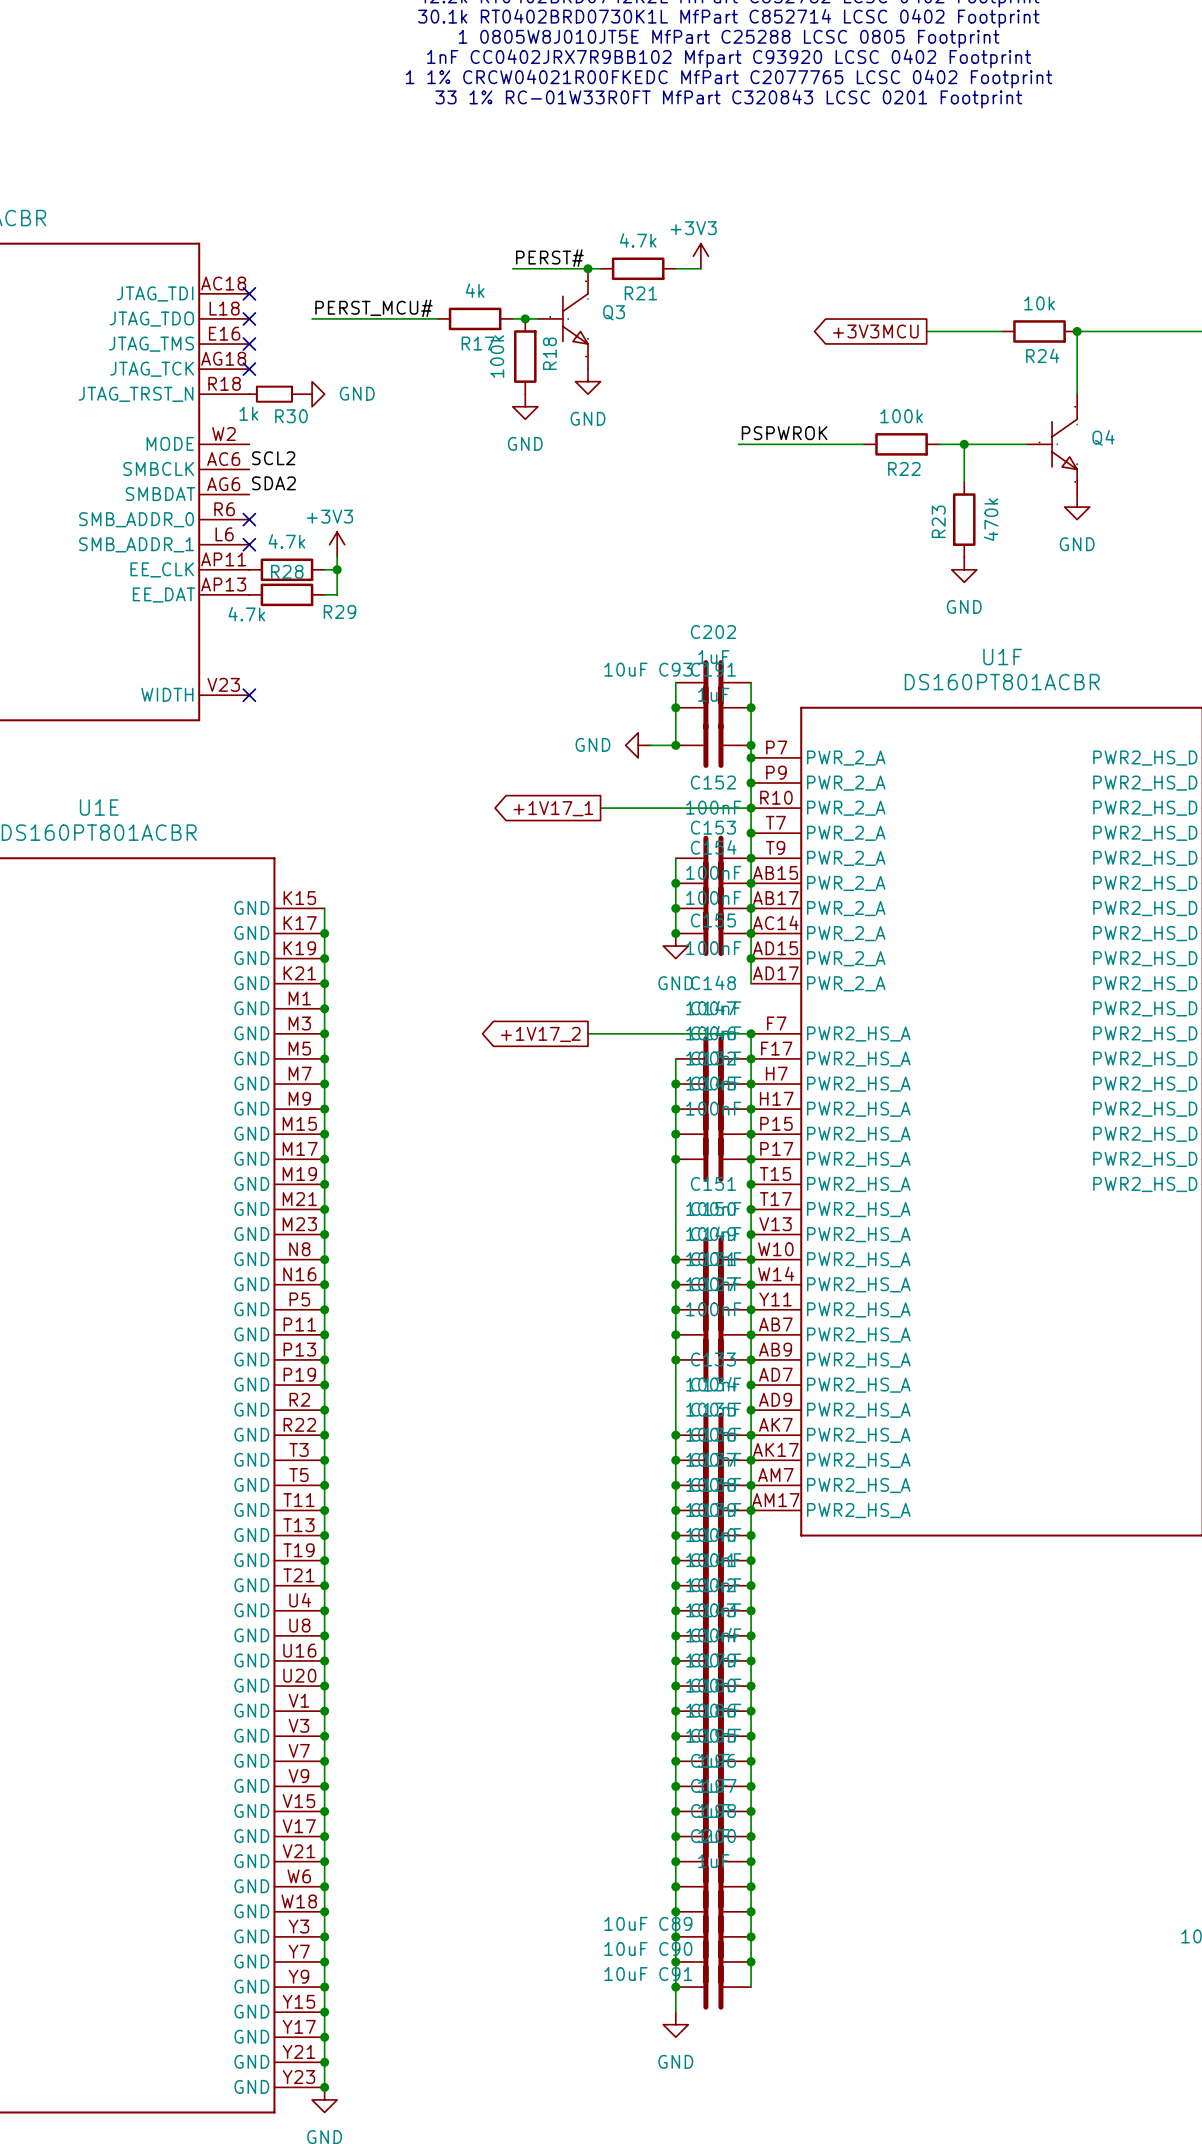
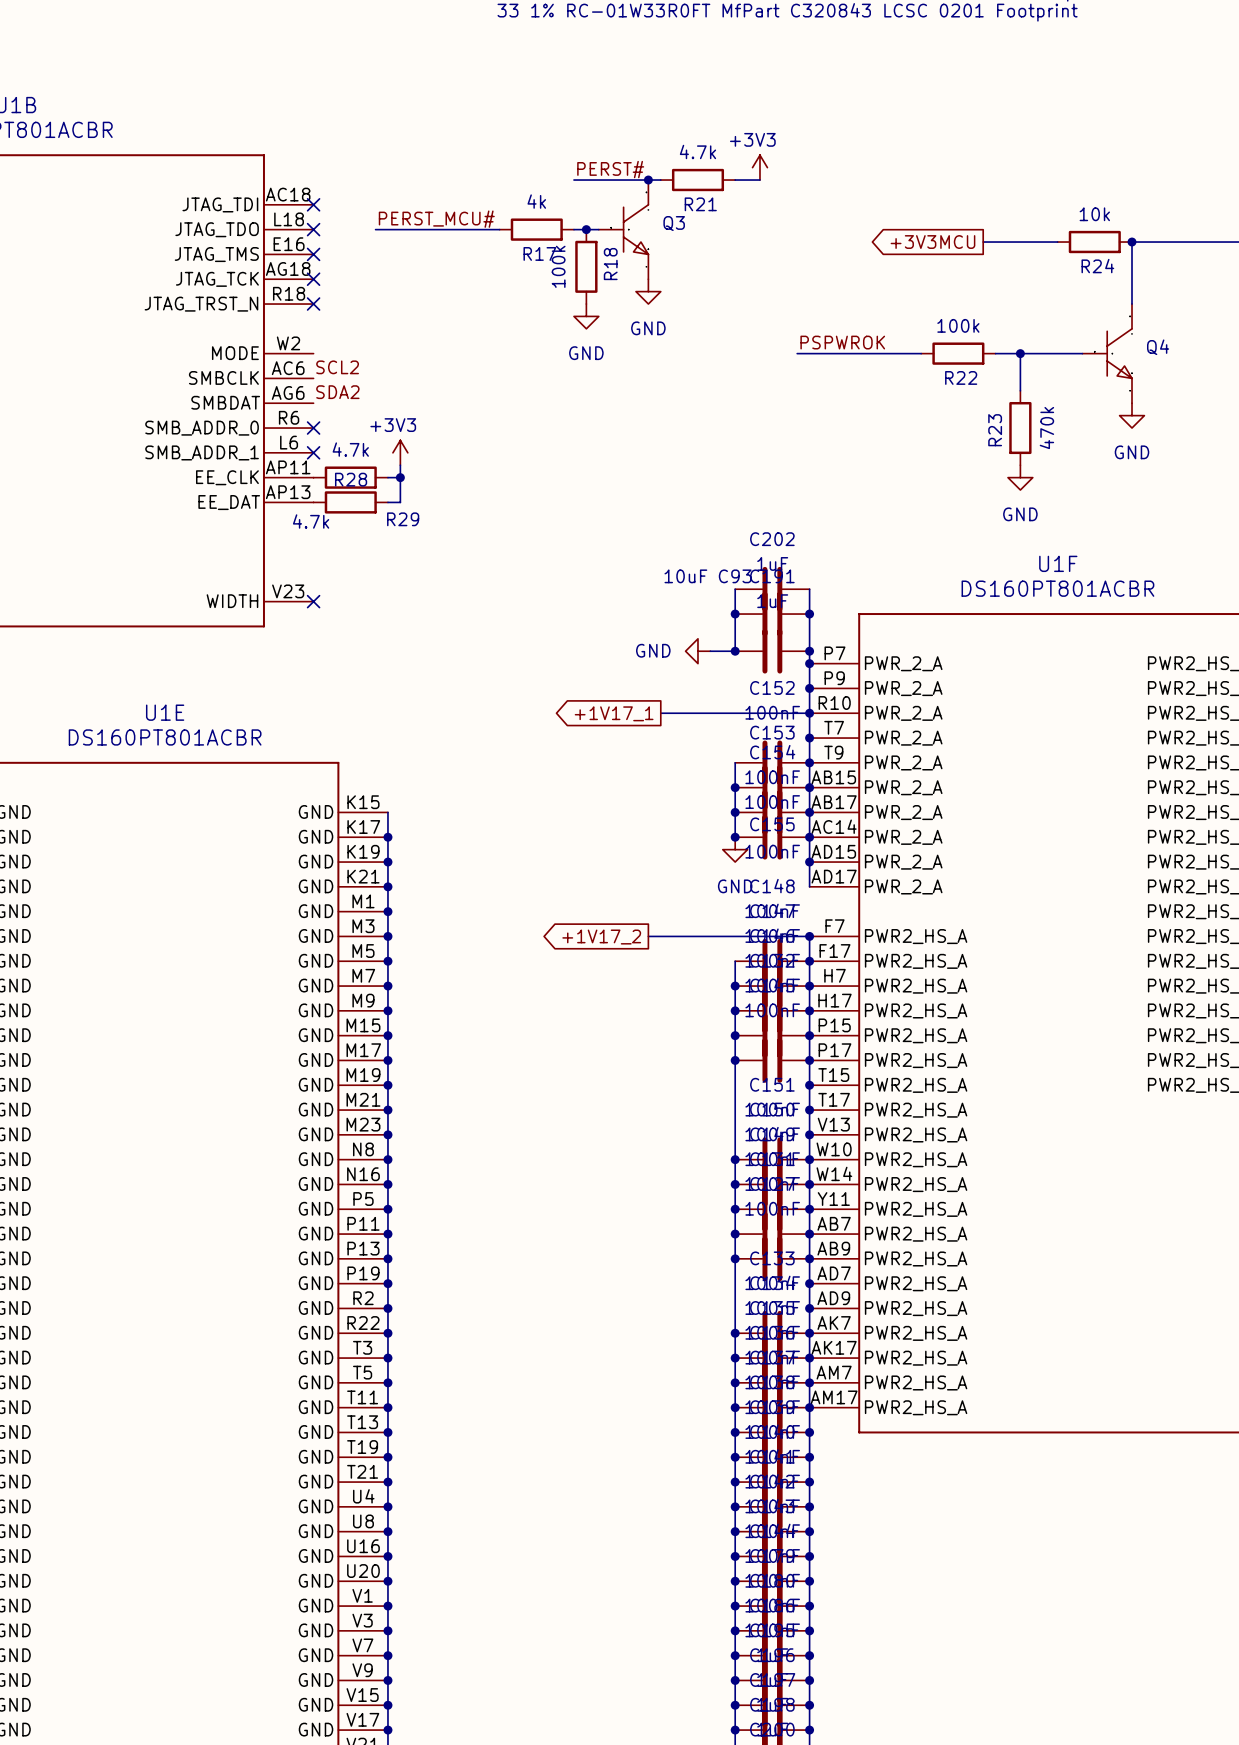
no-connect mark: none -> (313, 304)
R30: 1k (274, 394) -> none
power symbol: GND (312, 394) -> none

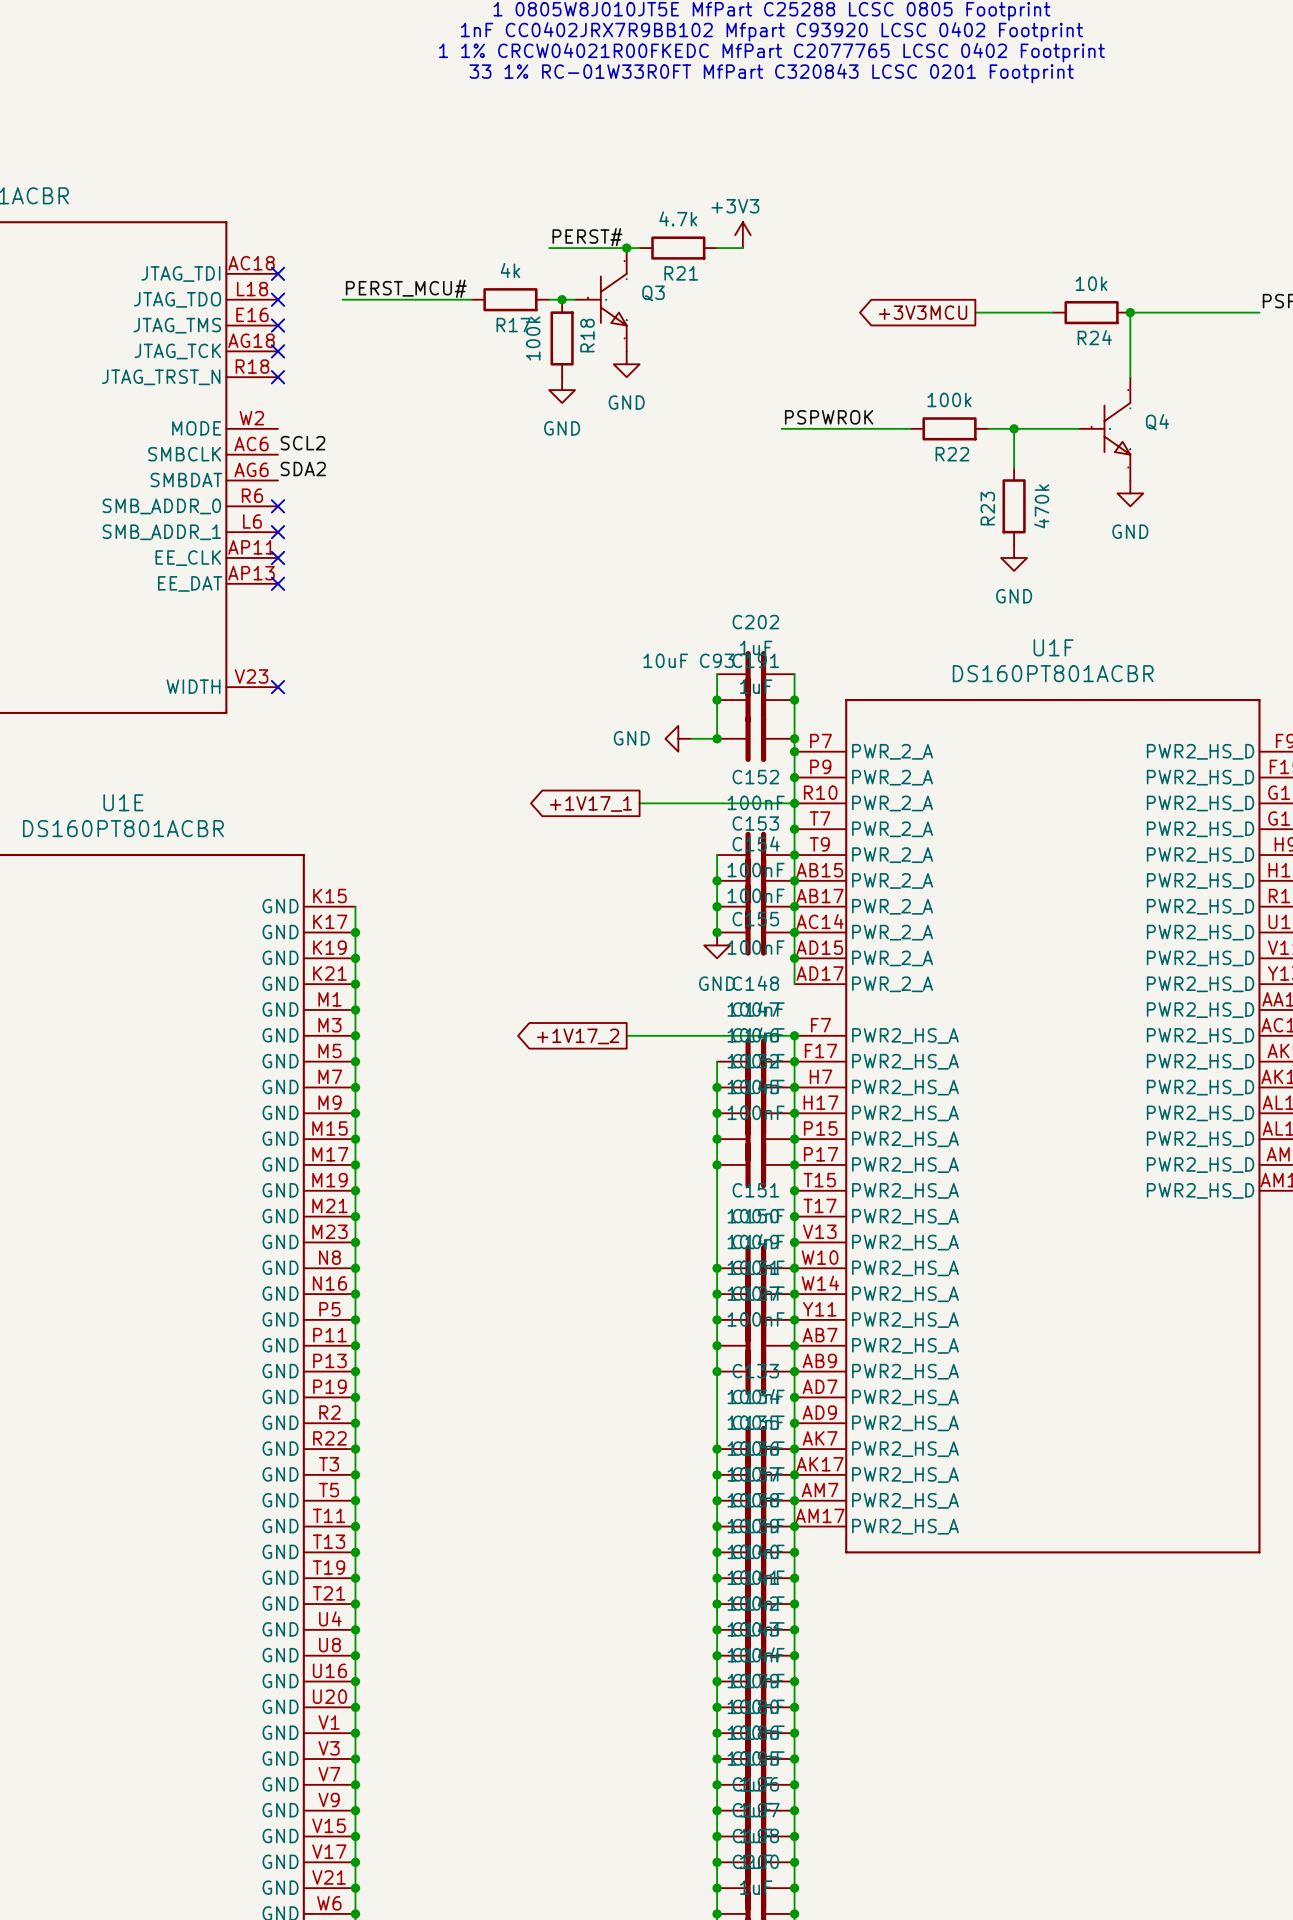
power symbol: +3V3 (400, 452) -> none
wire: (400, 465) (400, 502) (387, 502) -> none
no-connect mark: none -> (277, 557)
R28: 4.7k (350, 477) -> none
wire: (387, 477) (400, 477) -> none
junction: (400, 477) -> none
no-connect mark: none -> (277, 583)
R29: 4.7k (350, 502) -> none

